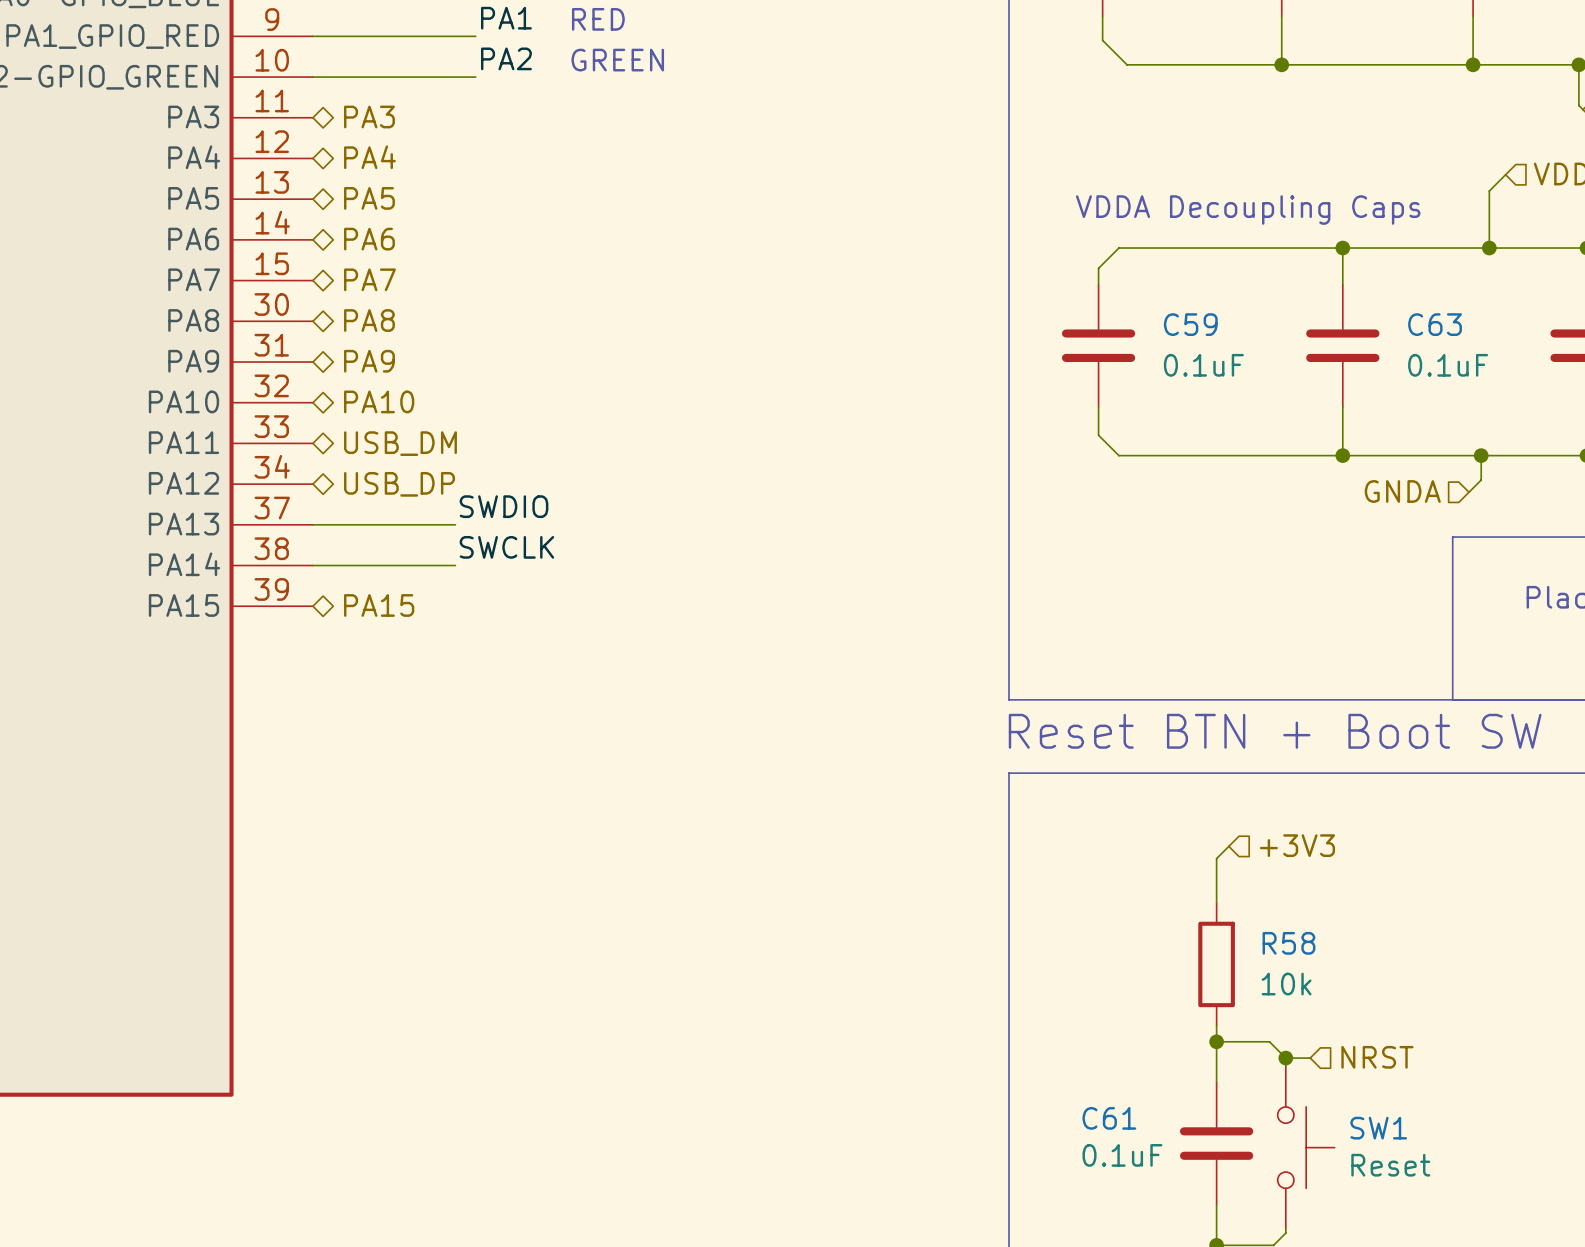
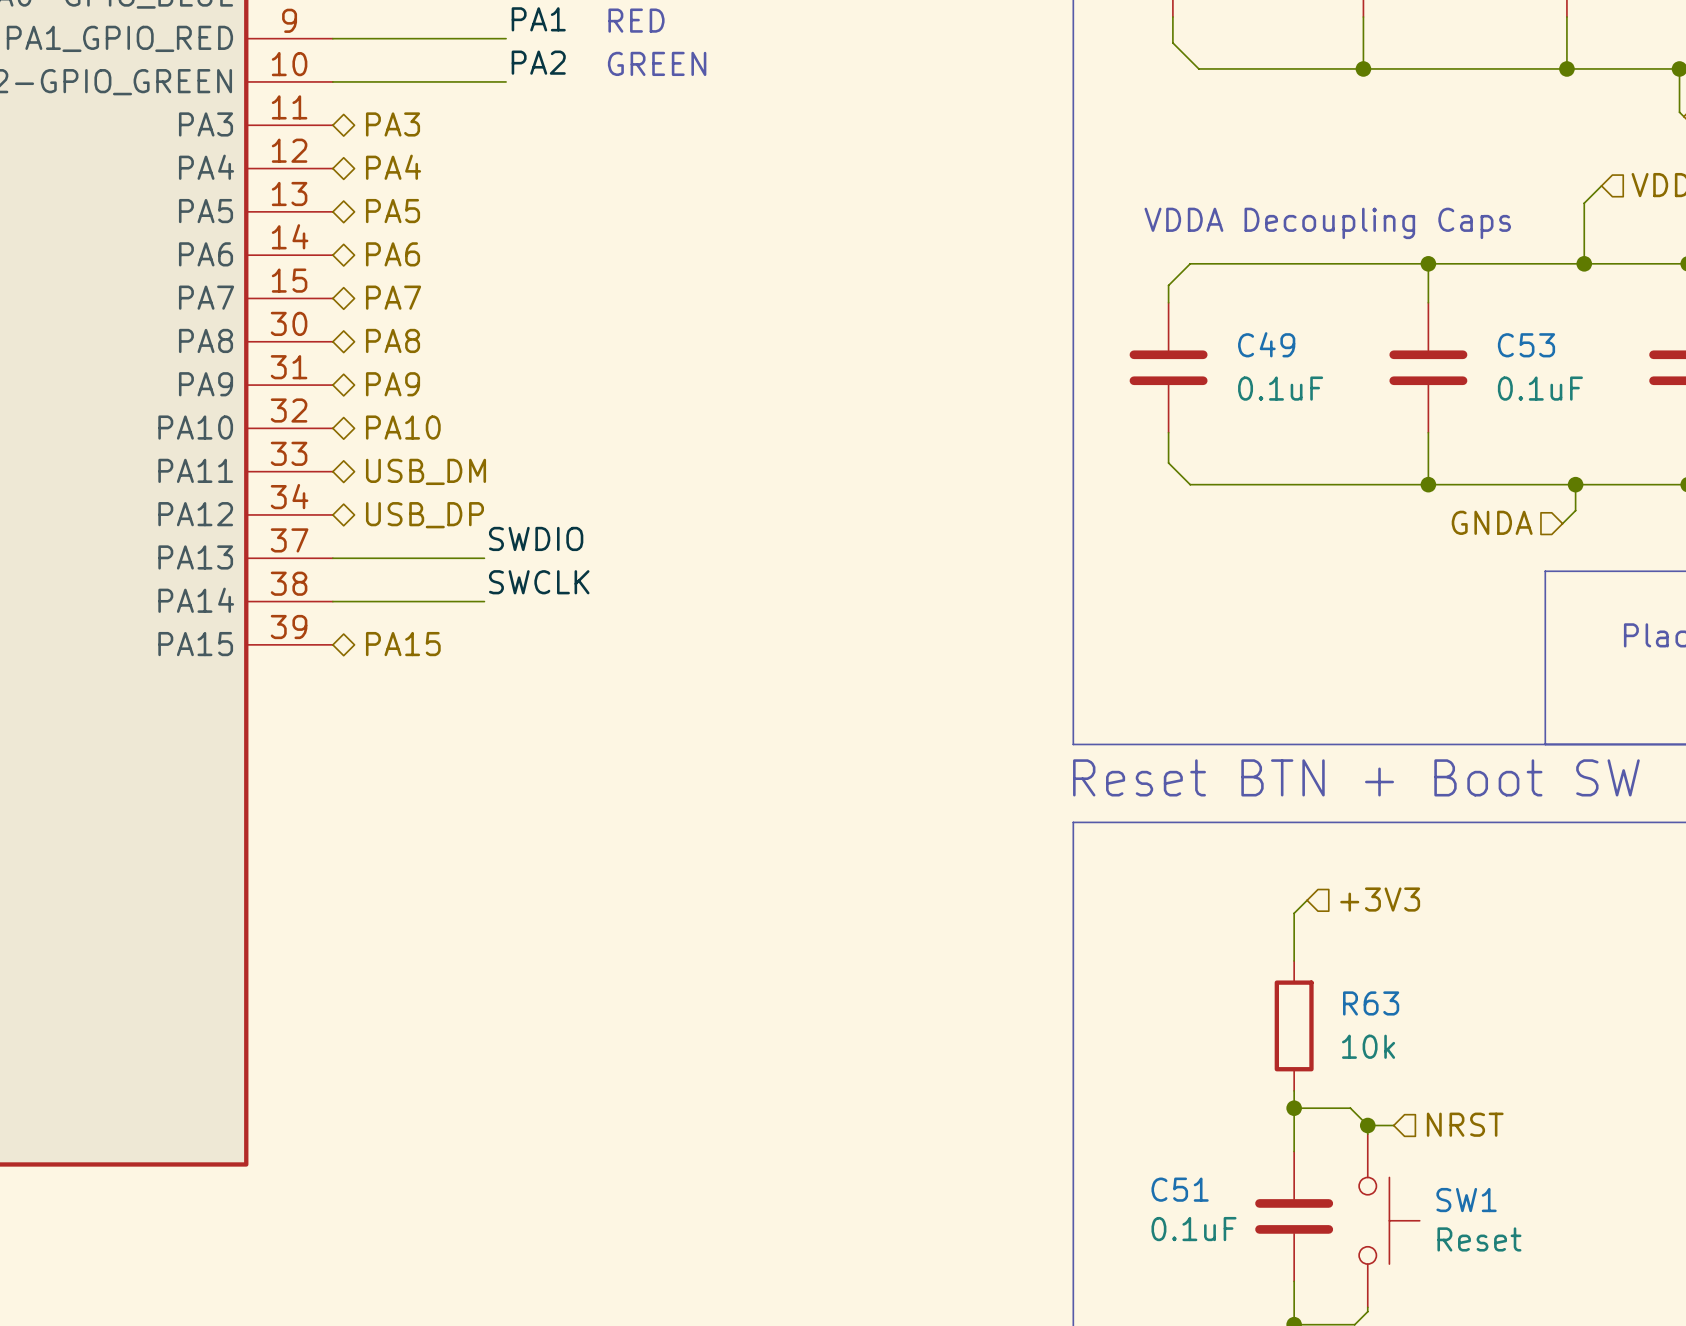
C59 name: C59 (1190, 324) -> C49 (1266, 344)
C63 name: C63 (1435, 324) -> C53 (1526, 345)
R58 name: R58 (1288, 943) -> R63 (1371, 1003)
C61 name: C61 (1109, 1118) -> C51 (1180, 1189)

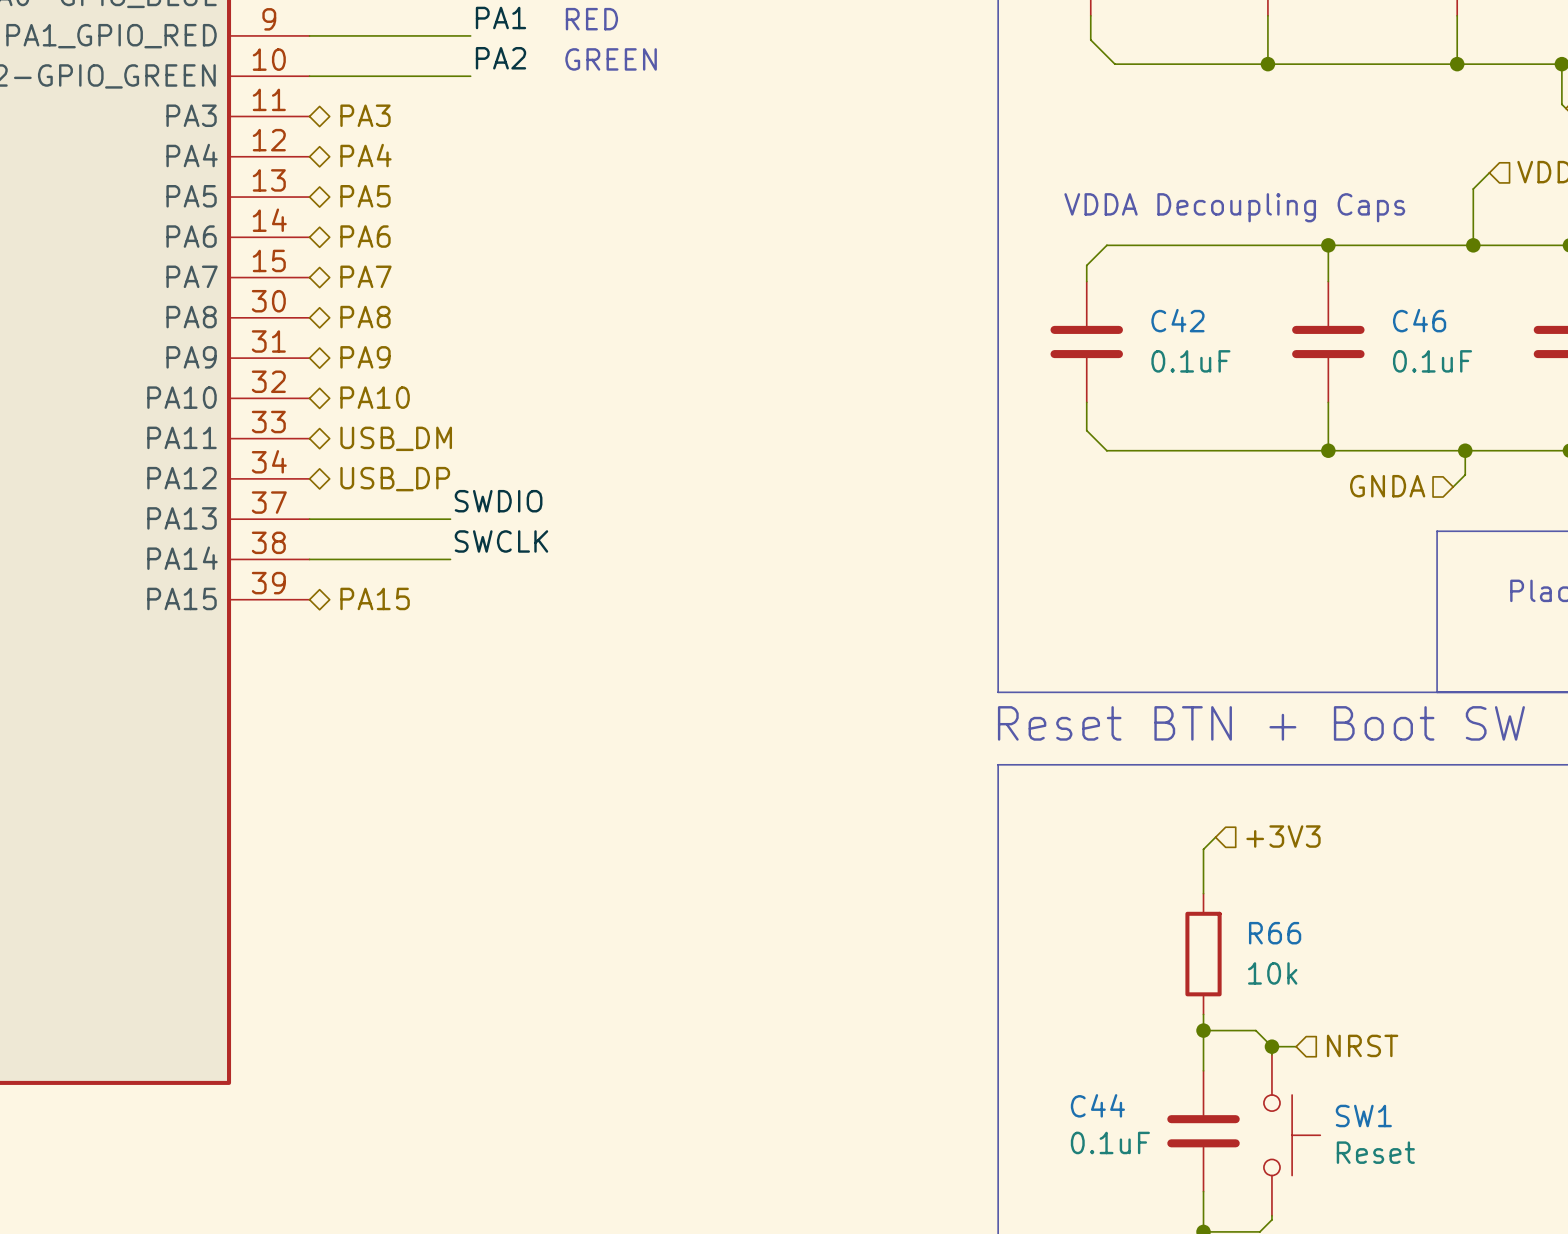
C49 name: C49 (1266, 344) -> C42 (1177, 320)
C53 name: C53 (1526, 345) -> C46 (1419, 320)
R63 name: R63 (1371, 1003) -> R66 (1275, 933)
C51 name: C51 (1180, 1189) -> C44 (1097, 1105)

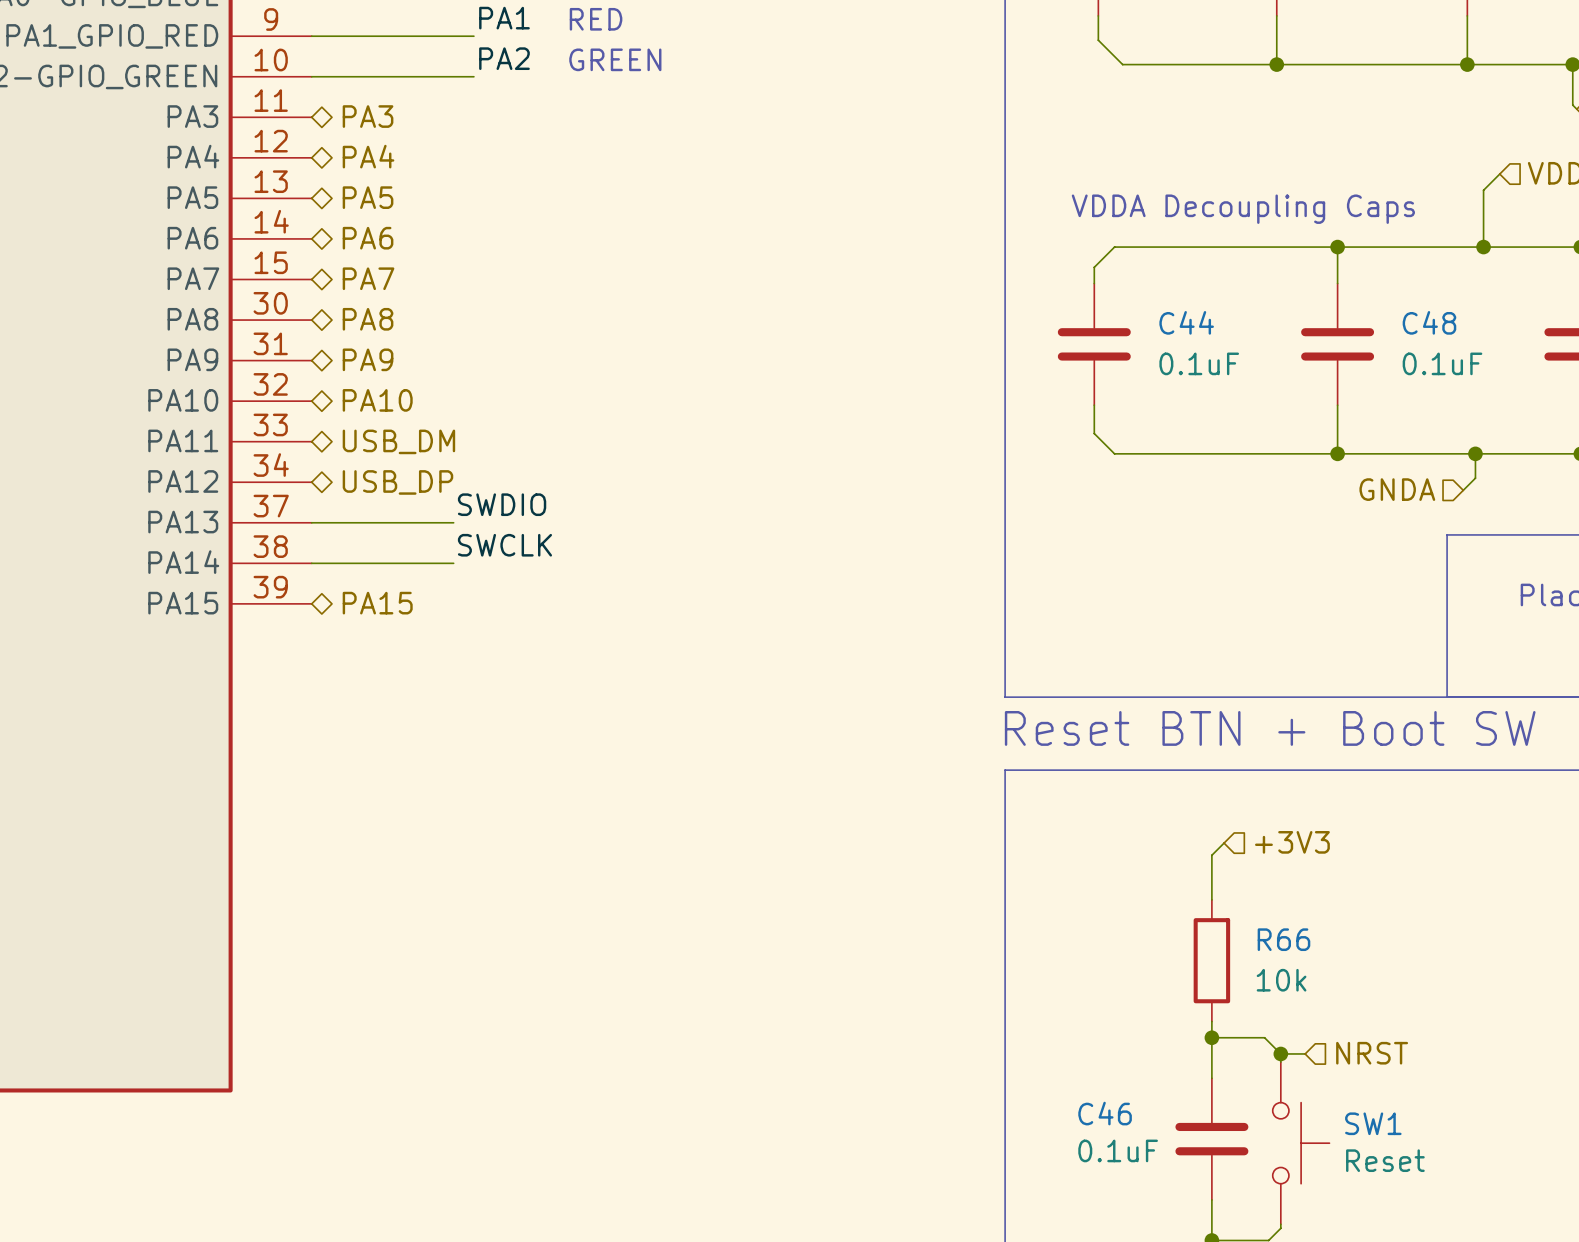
C42 name: C42 (1177, 320) -> C44 (1186, 322)
C46 name: C46 (1419, 320) -> C48 (1429, 322)
C44 name: C44 (1097, 1105) -> C46 (1105, 1113)

